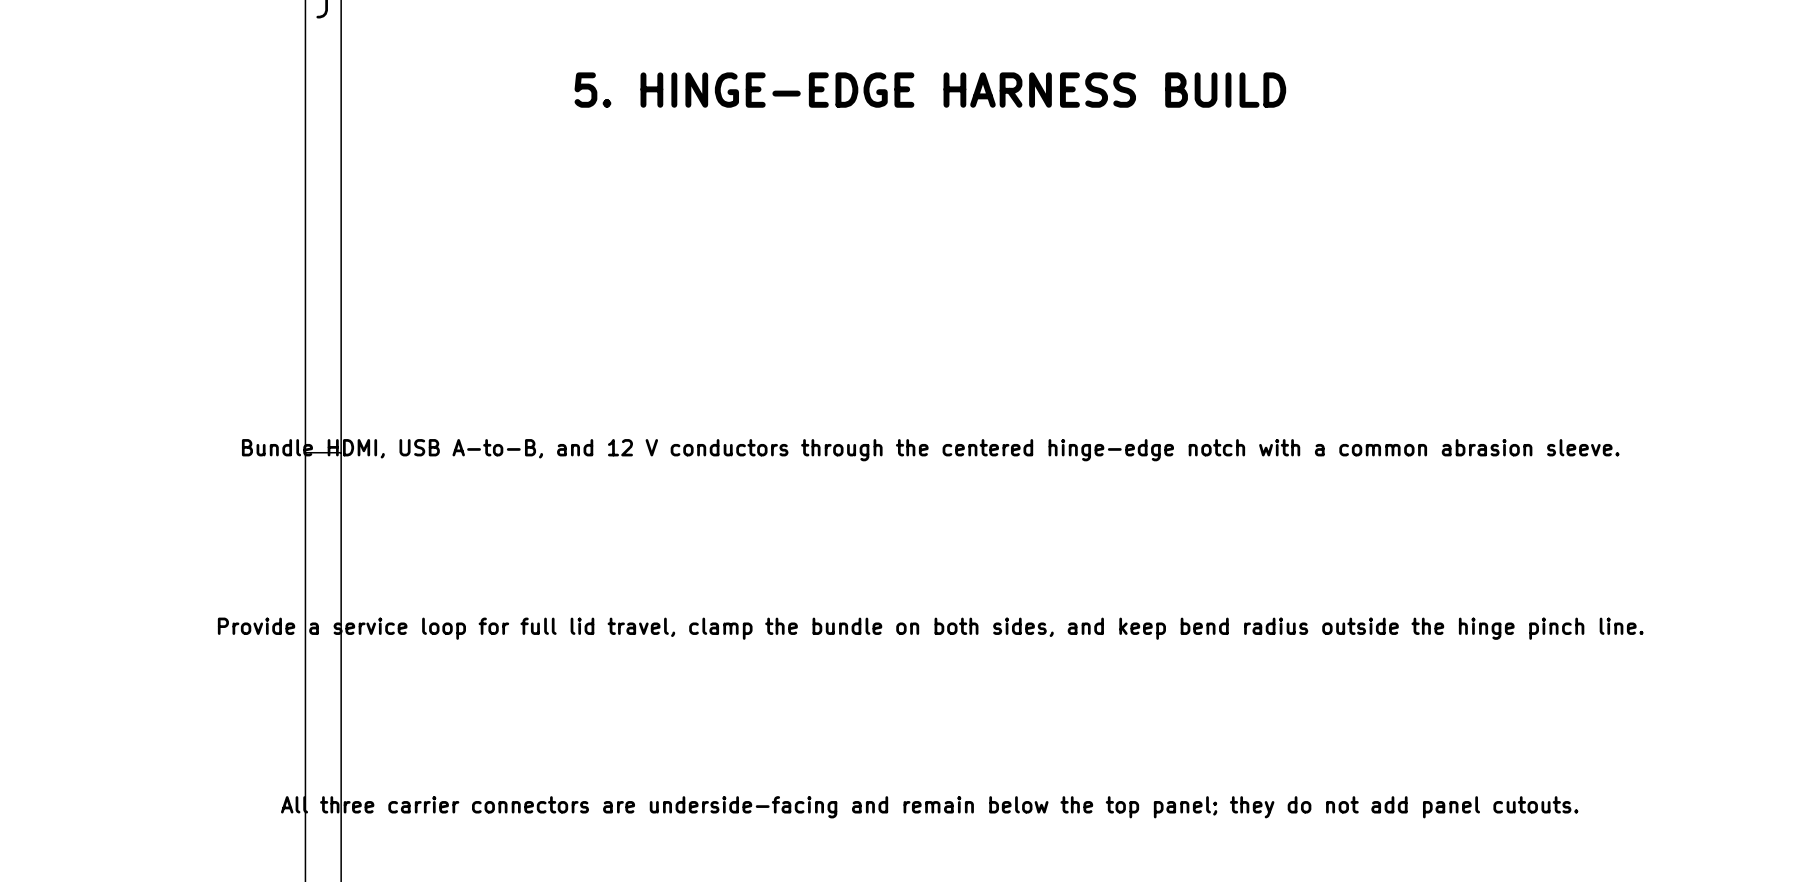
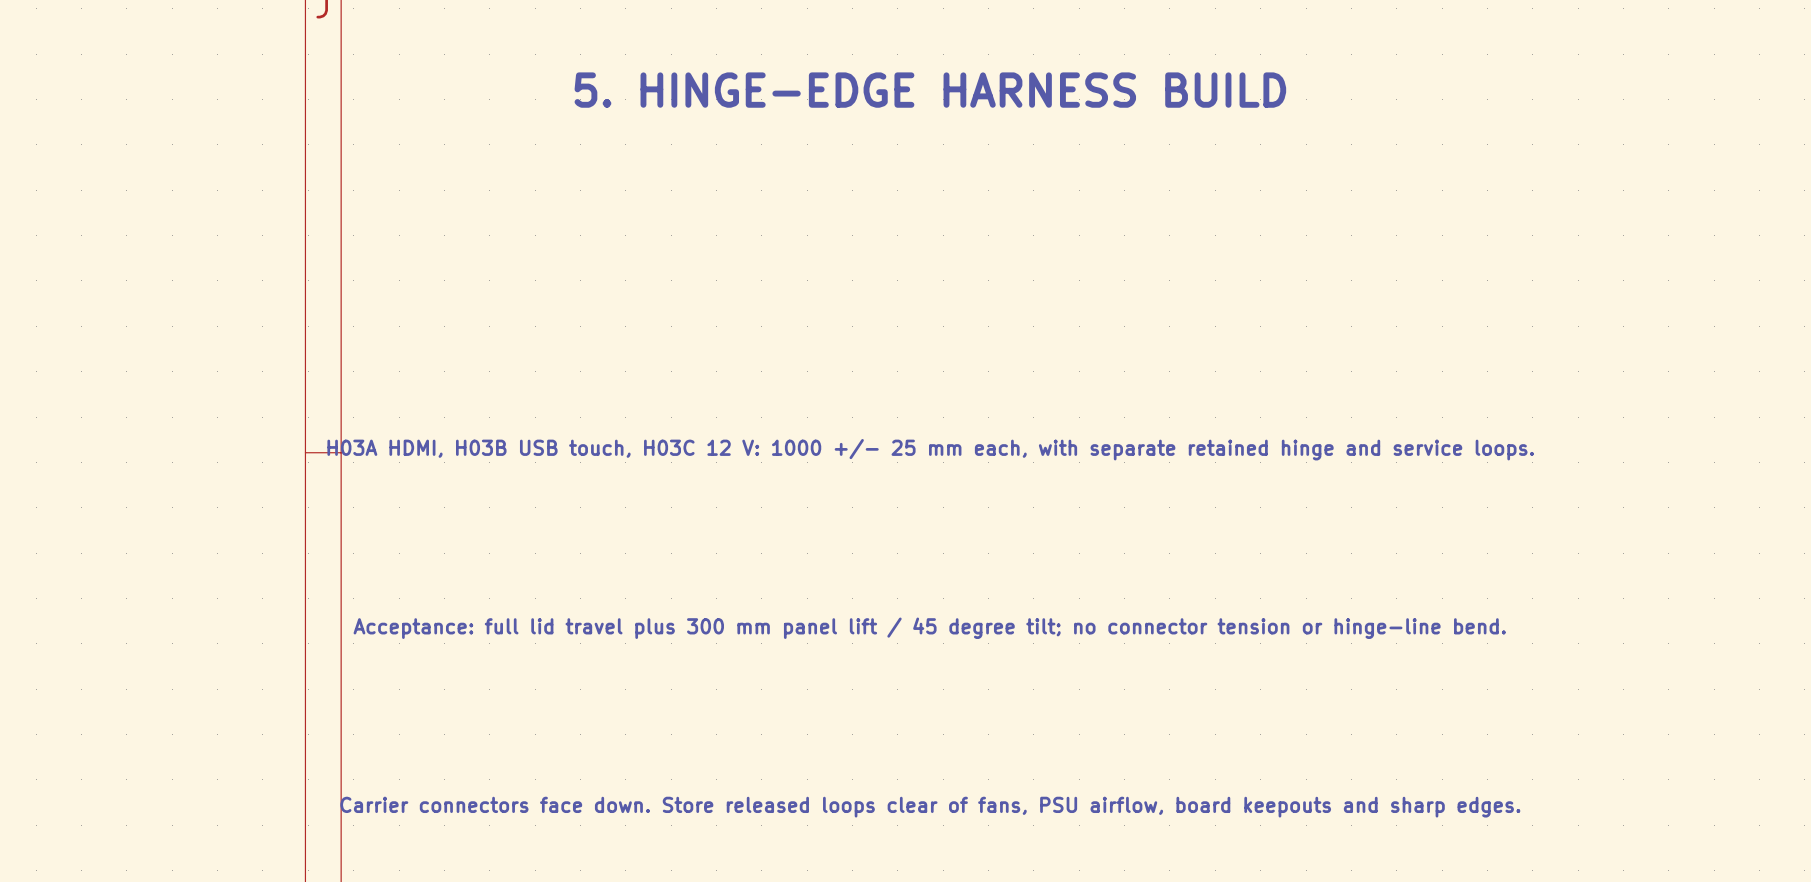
text: Bundle HDMI, USB A-to-B, and 12 V conductors through the centered hinge-edge notch with a common abrasion sleeve. (930, 450) -> H03A HDMI, H03B USB touch, H03C 12 V: 1000 +/- 25 mm each, with separate retained hinge and service loops. (930, 449)
text: Provide a service loop for full lid travel, clamp the bundle on both sides, and keep bend radius outside the hinge pinch line. (930, 628) -> Acceptance: full lid travel plus 300 mm panel lift / 45 degree tilt; no connector tension or hinge-line bend. (929, 628)
text: All three carrier connectors are underside-facing and remain below the top panel; they do not add panel cutouts. (929, 807) -> Carrier connectors face down. Store released loops clear of fans, PSU airflow, board keepouts and sharp edges. (930, 807)

